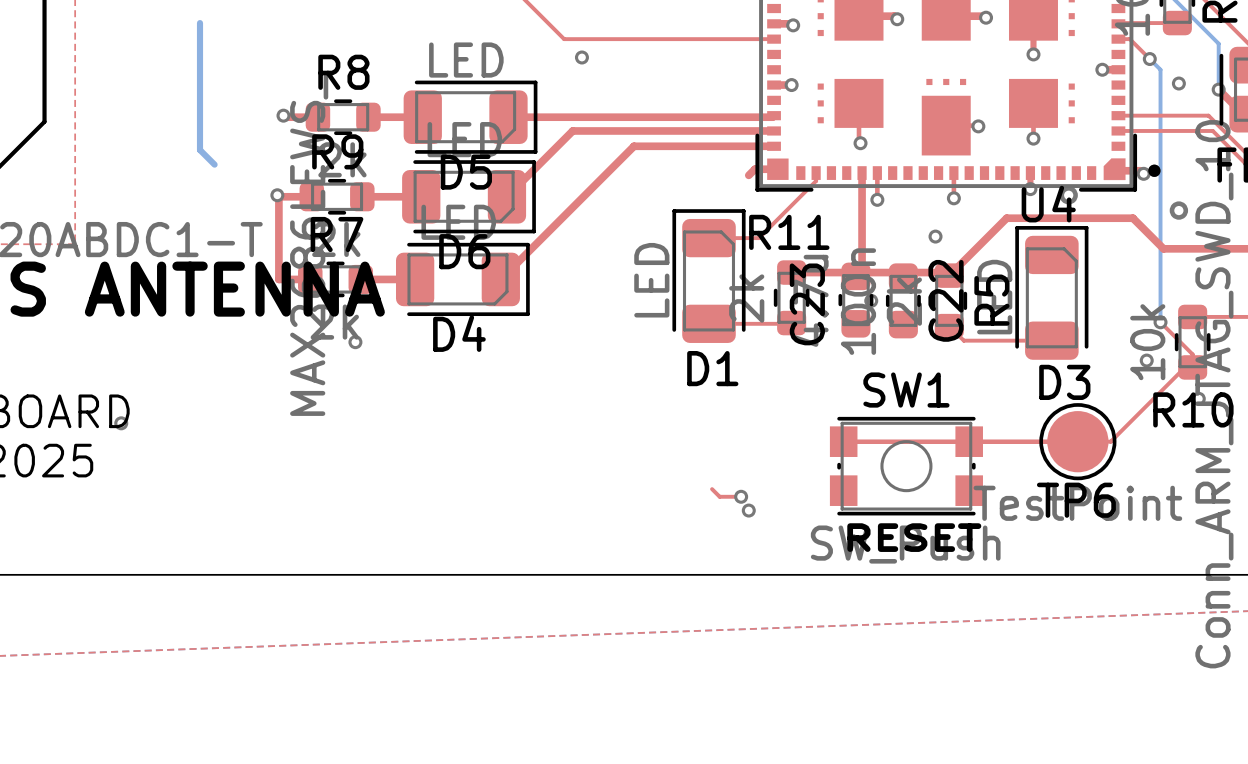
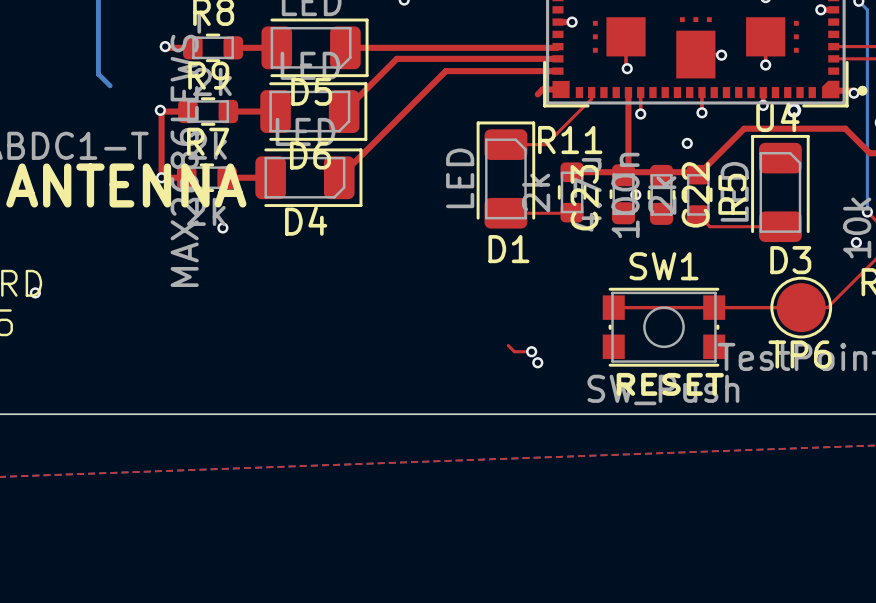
via: none -> (161, 177)

